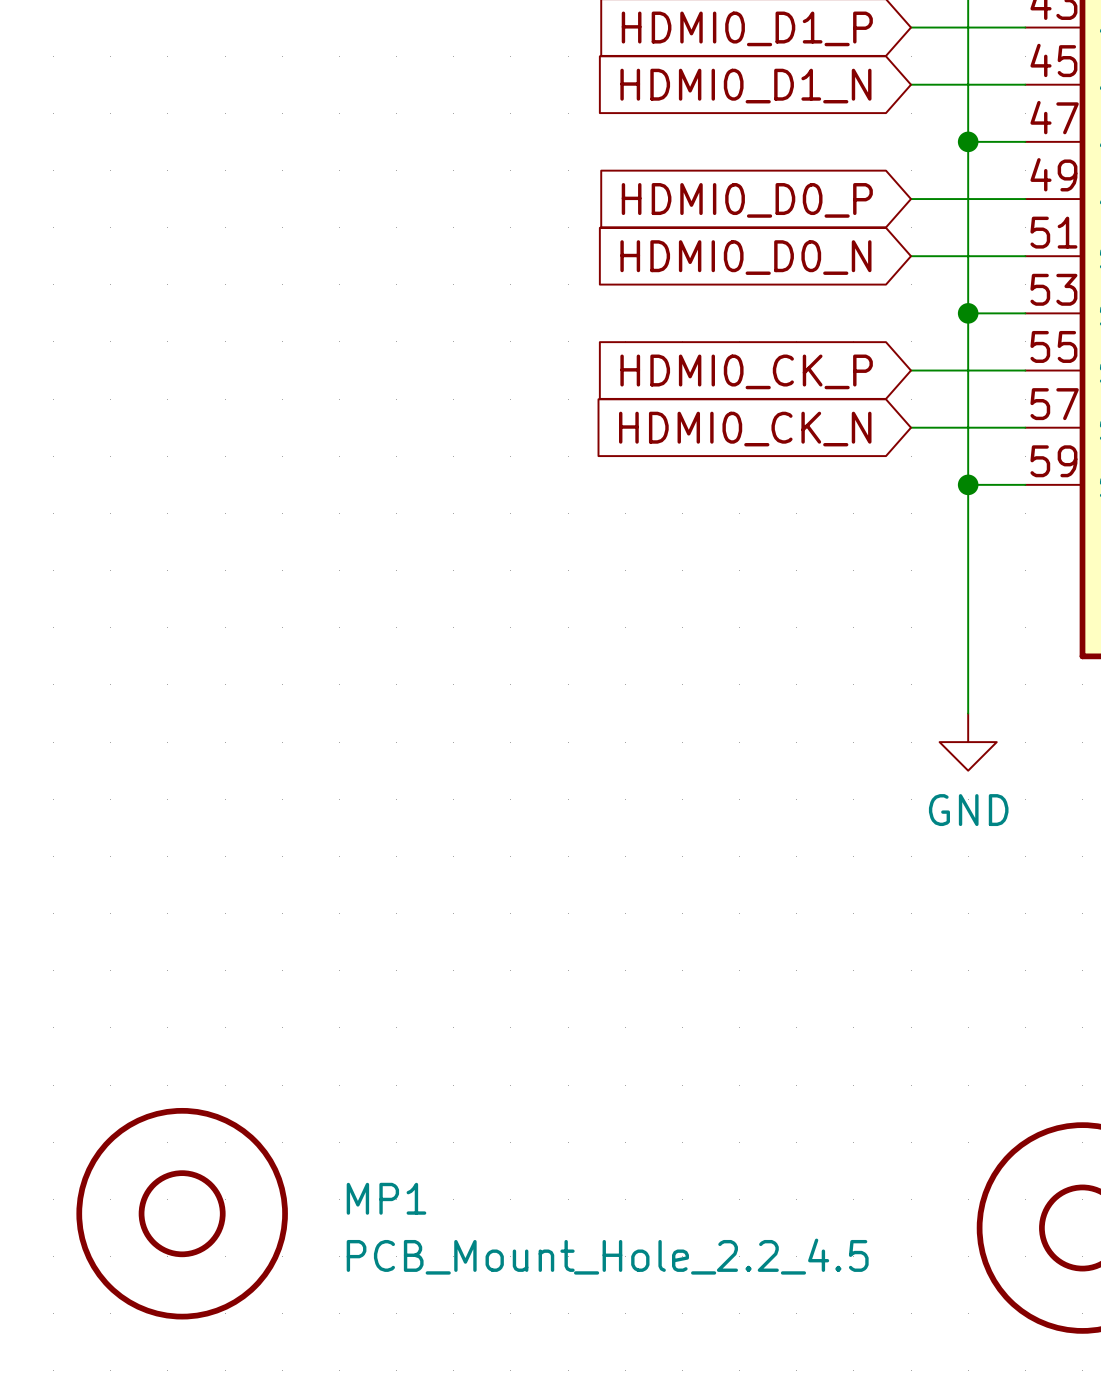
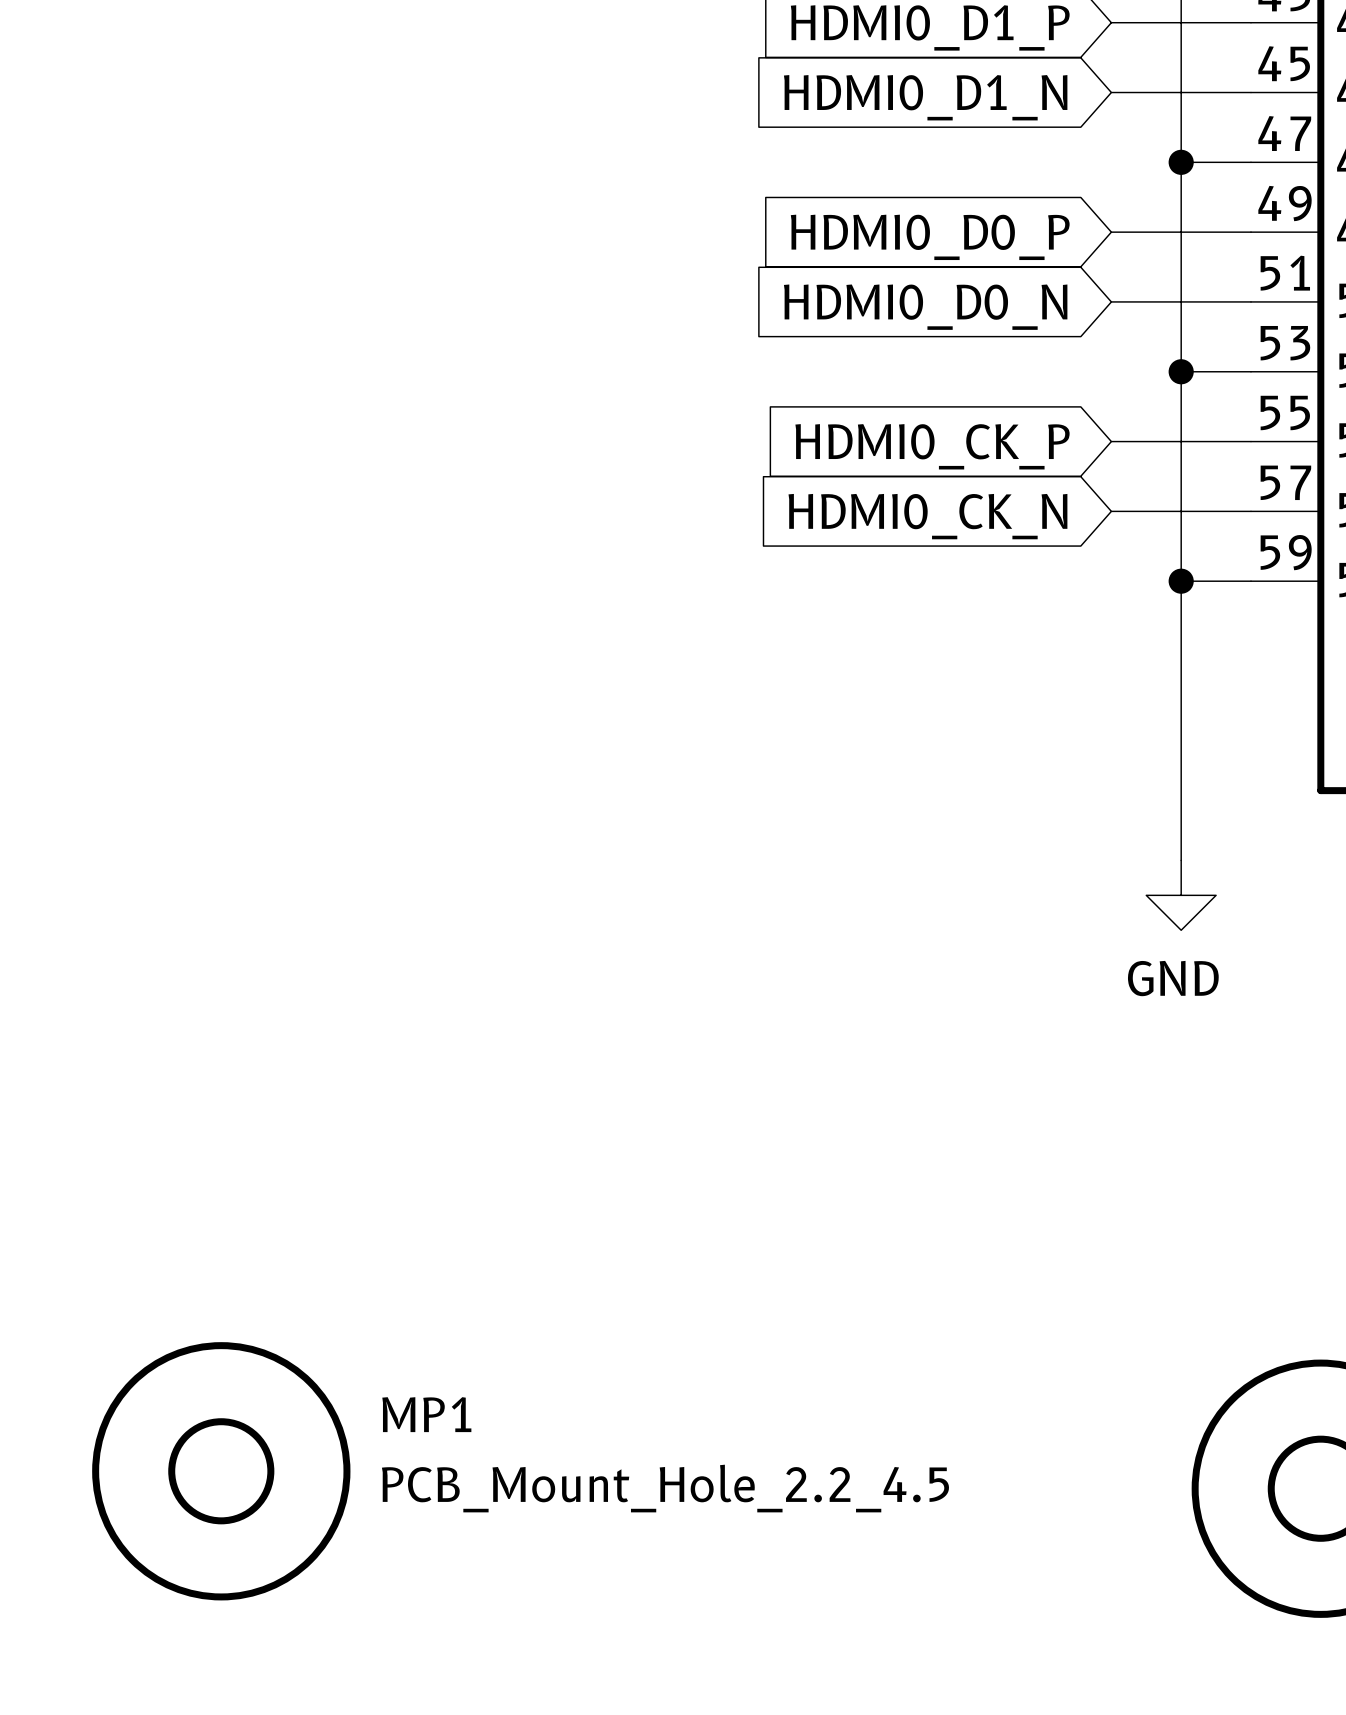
MP1 name position: MP1 (386, 1198) -> MP1 (426, 1414)
MP1 value position: PCB_Mount_Hole_2.2_4.5 (607, 1256) -> PCB_Mount_Hole_2.2_4.5 (665, 1488)

